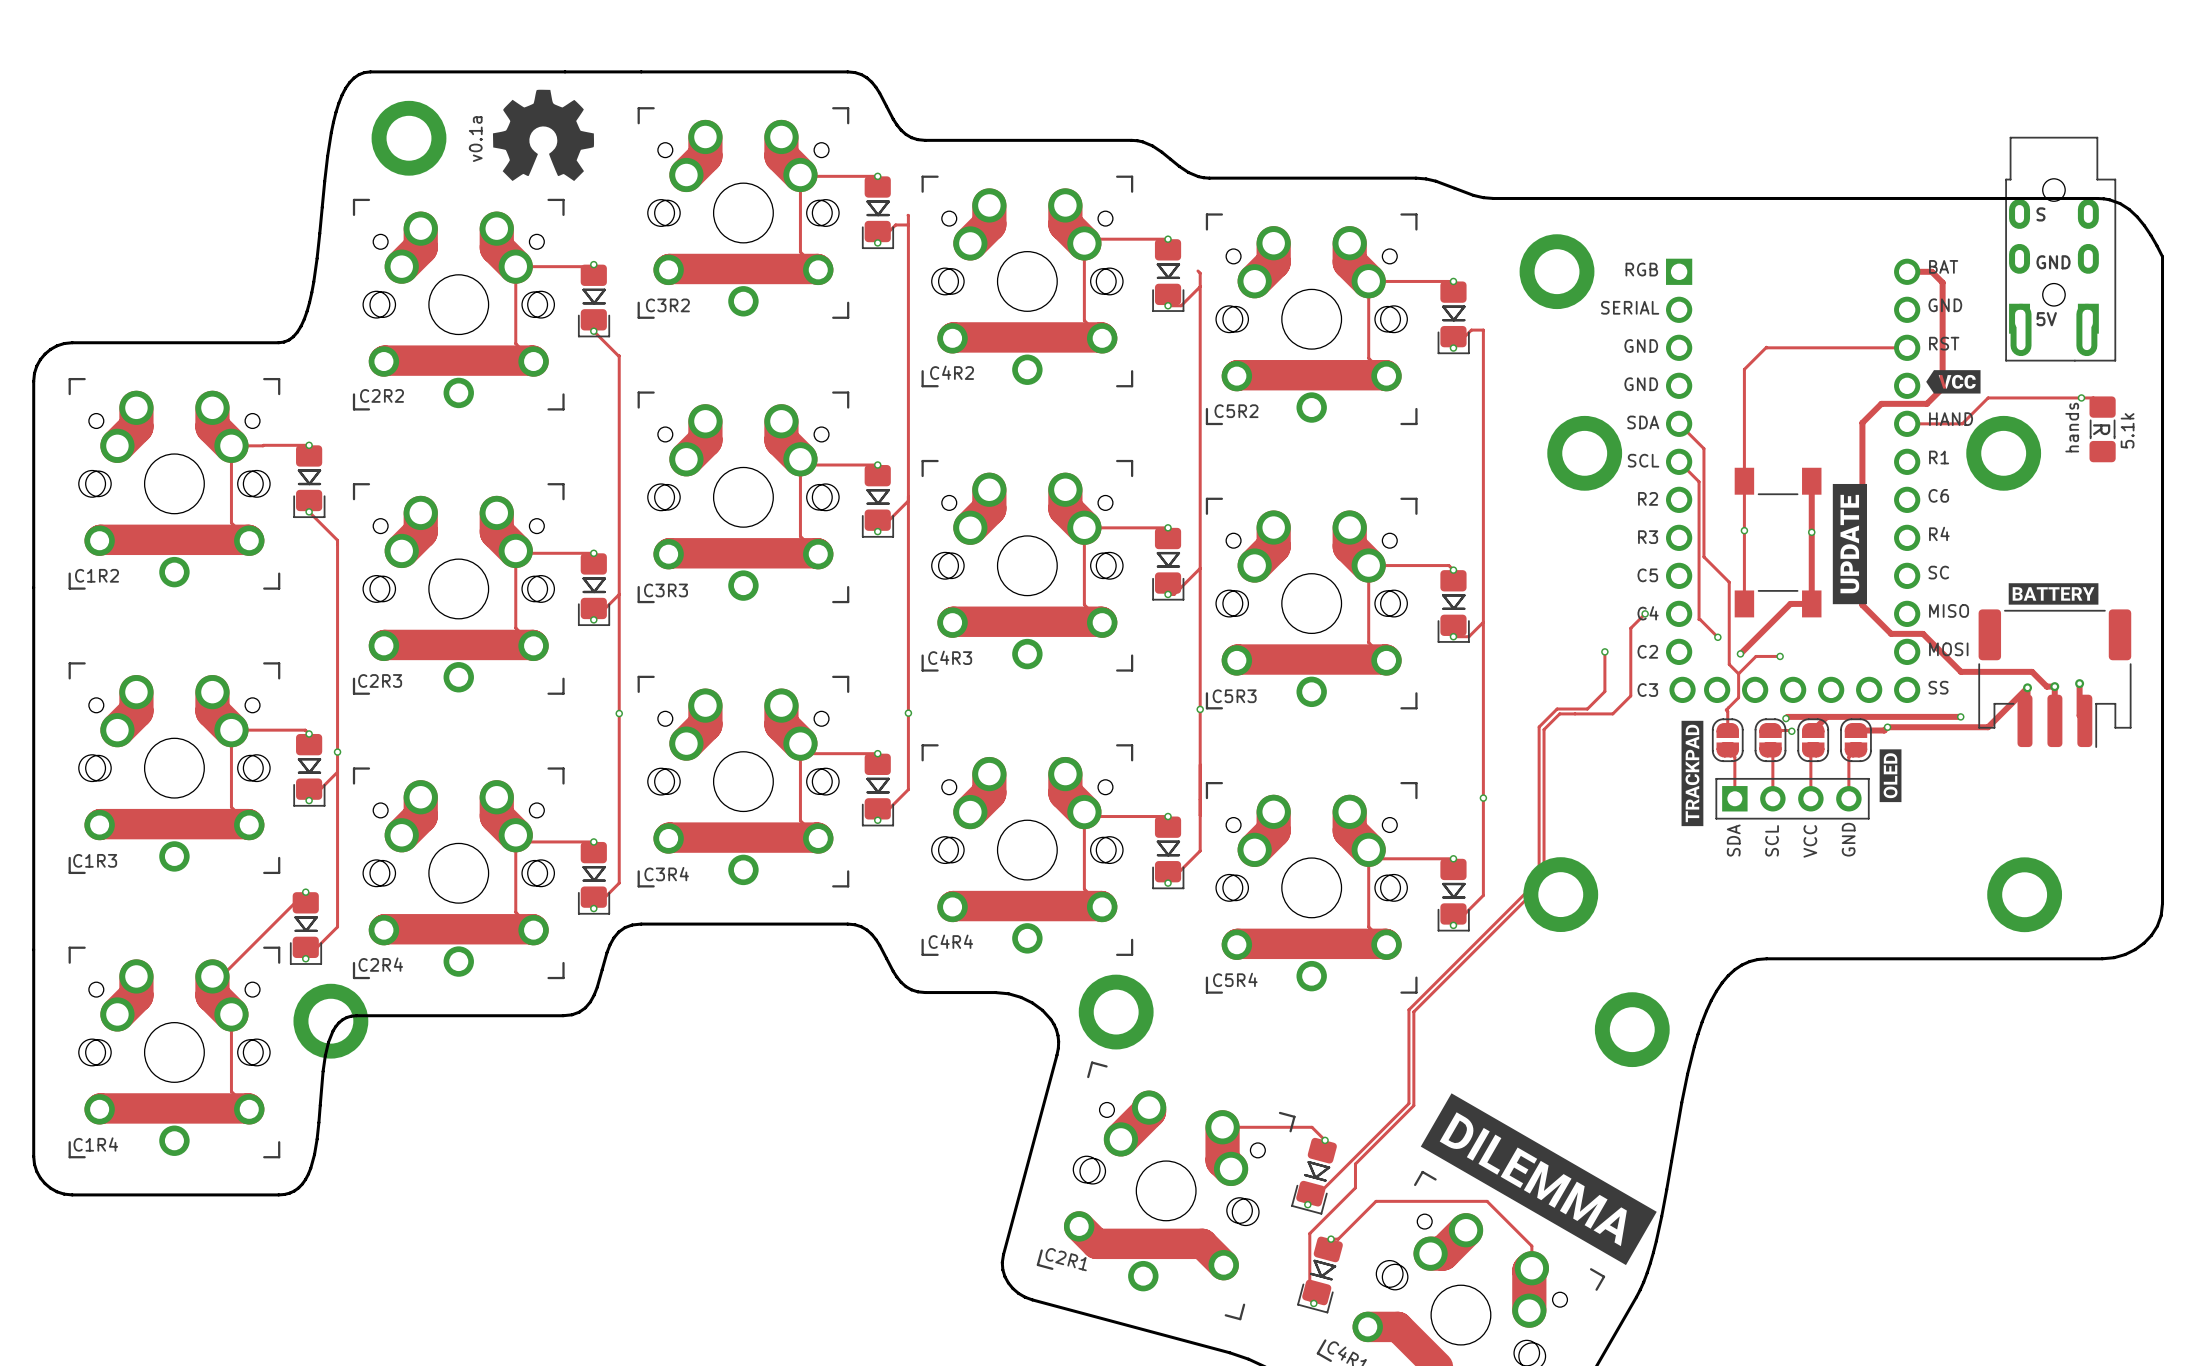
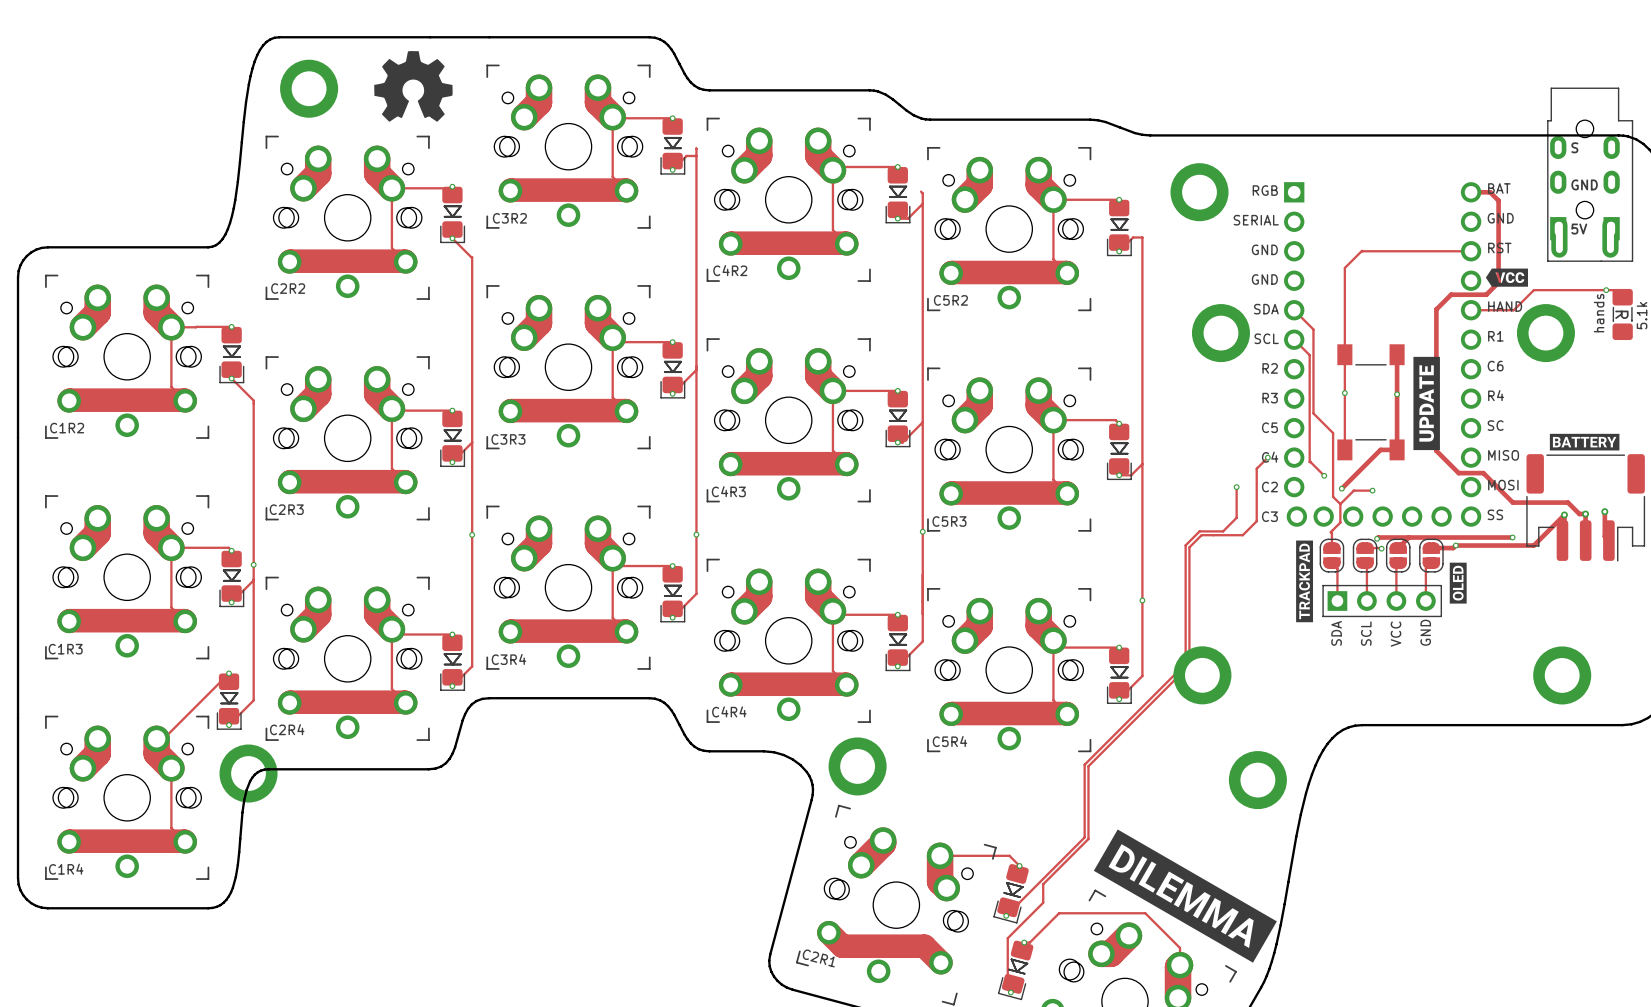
text: v0.1a (475, 139) -> none

